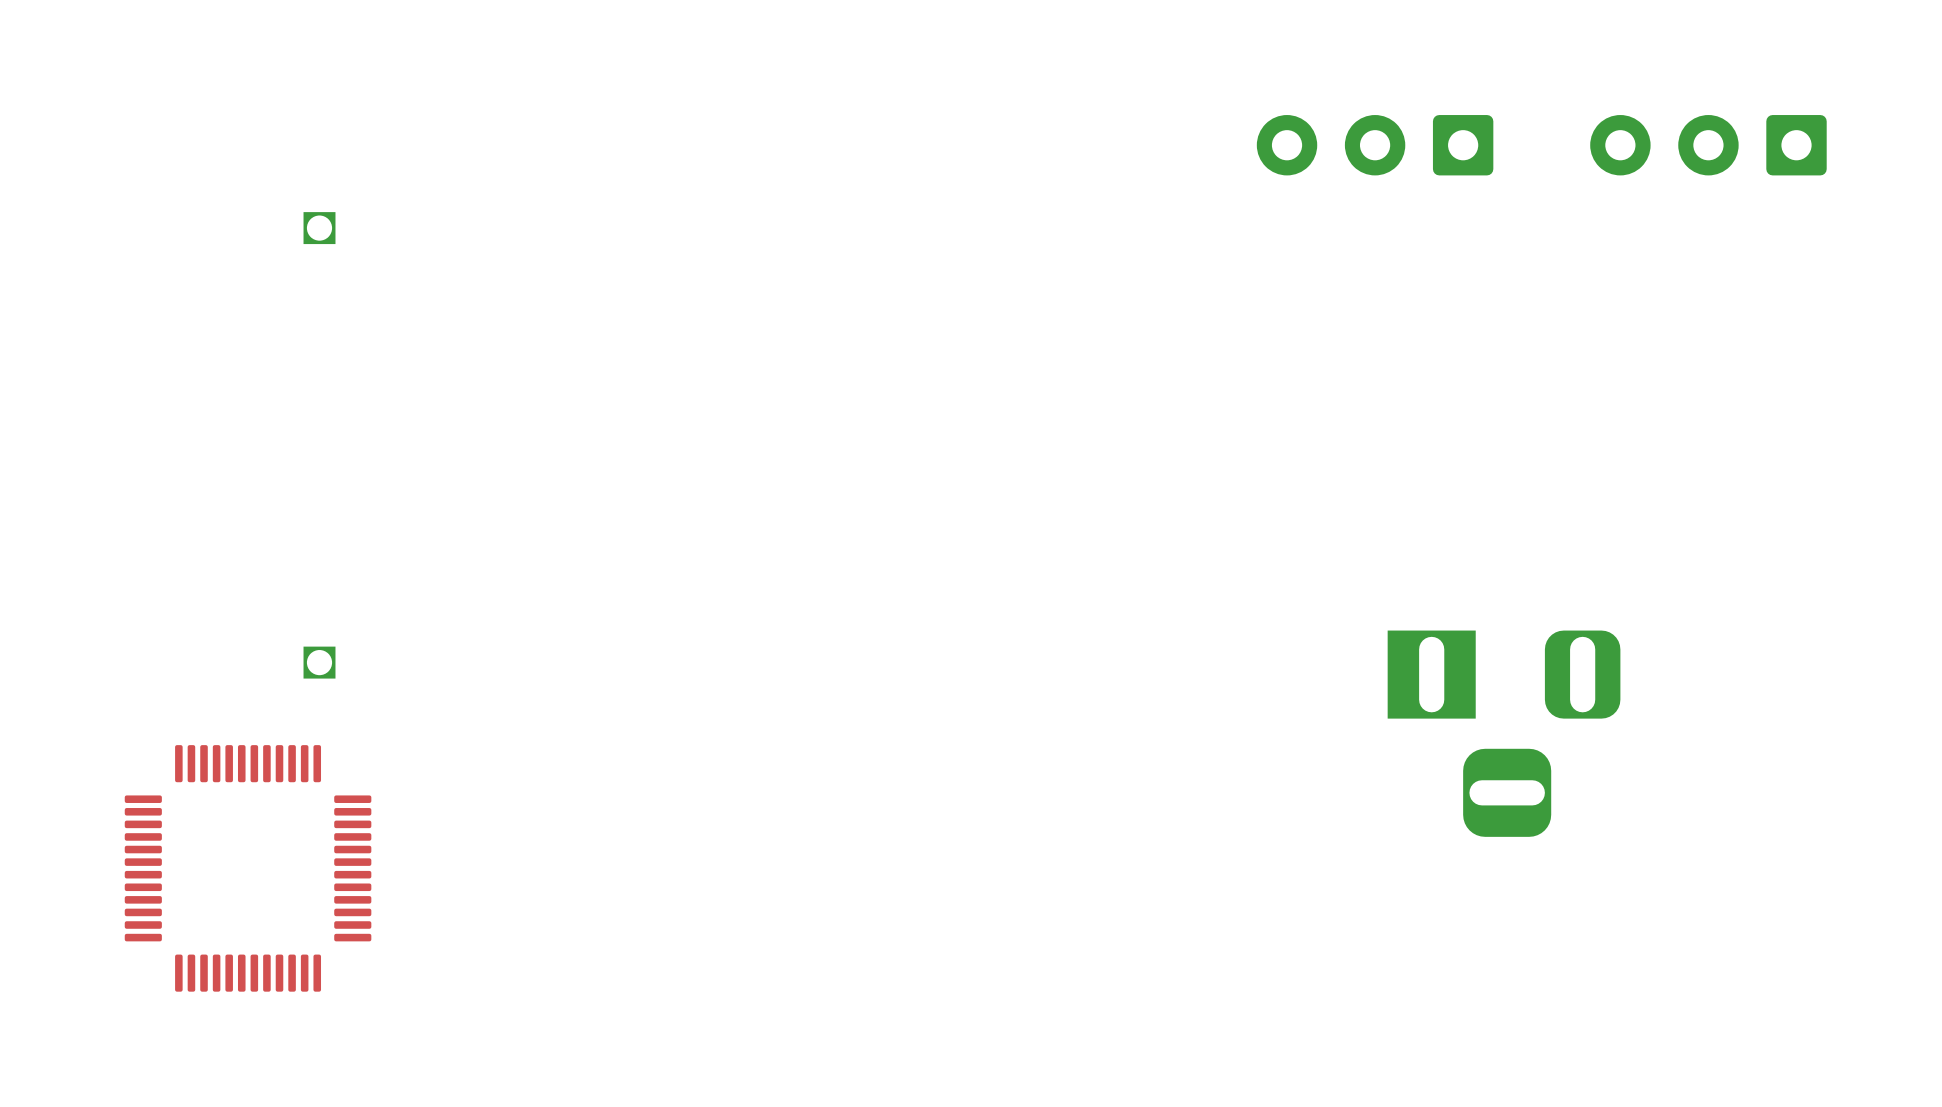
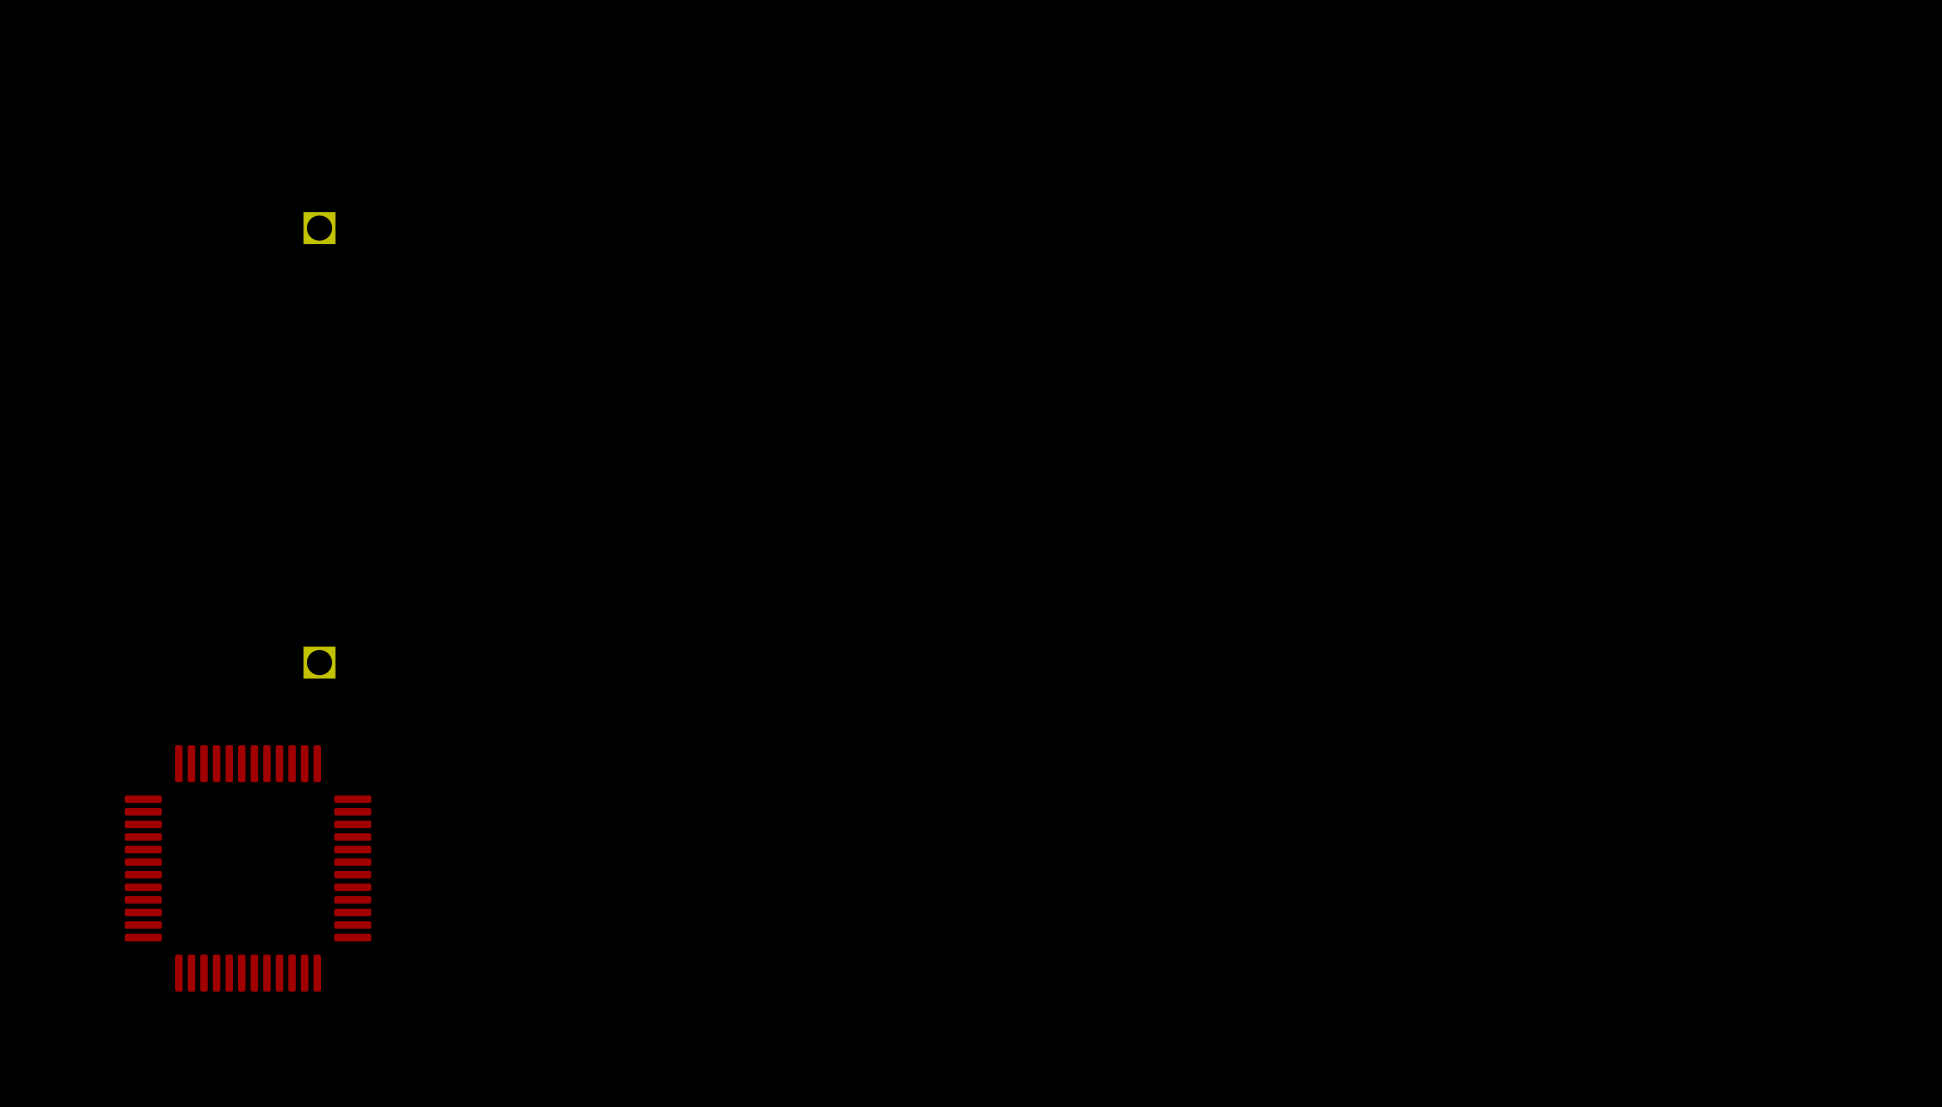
part: (1375, 145) -> none
part: (1708, 145) -> none
part: (1504, 733) -> none

